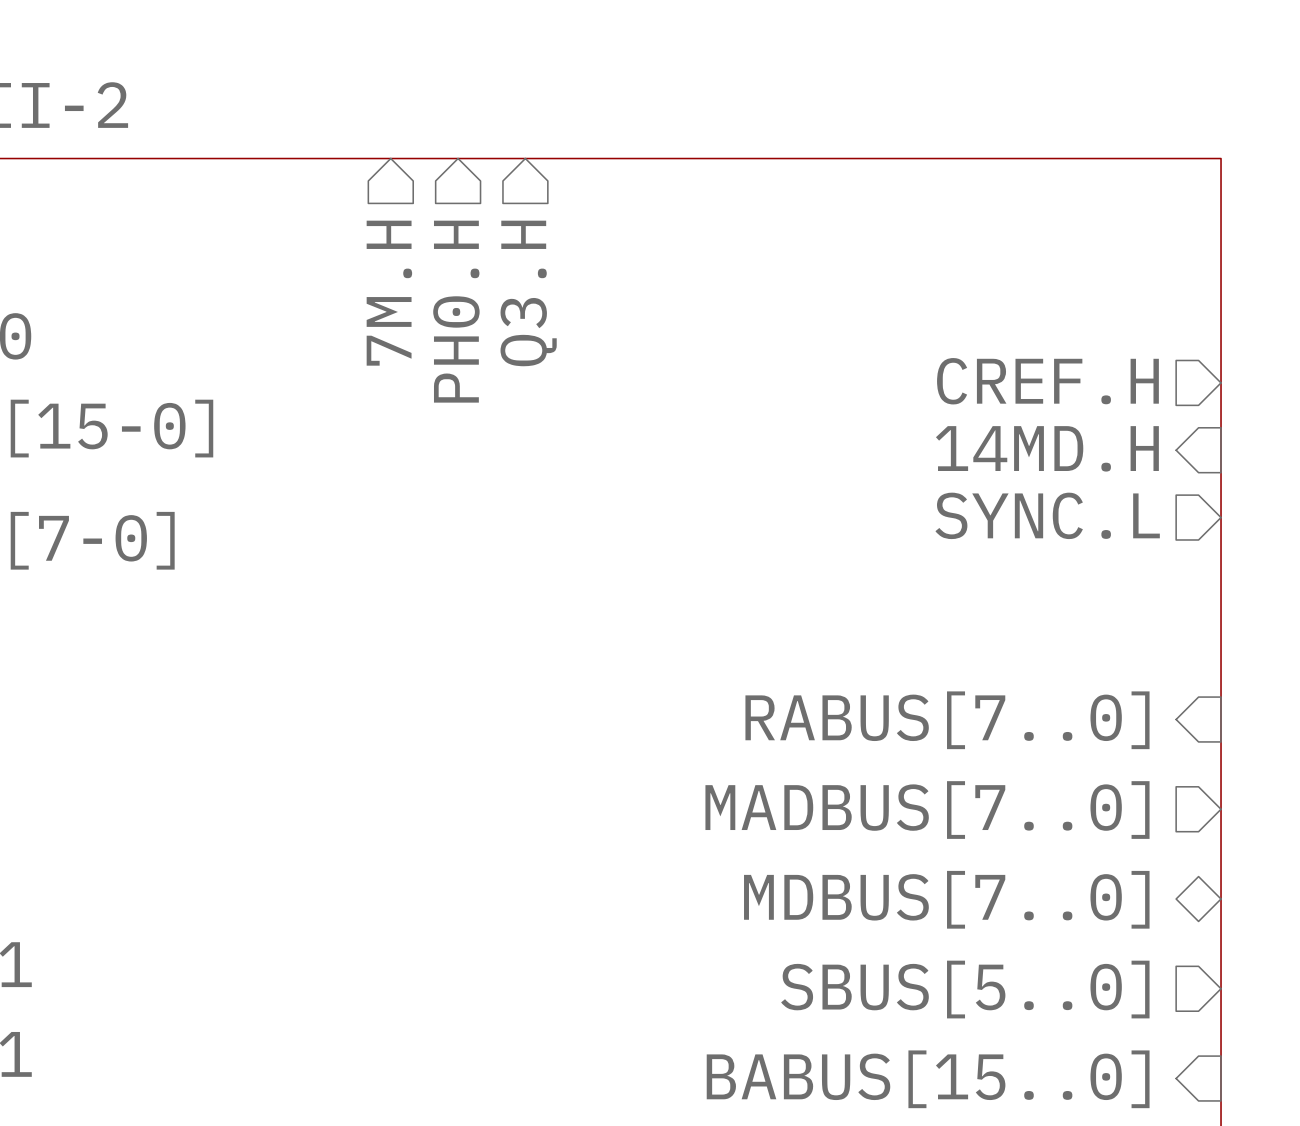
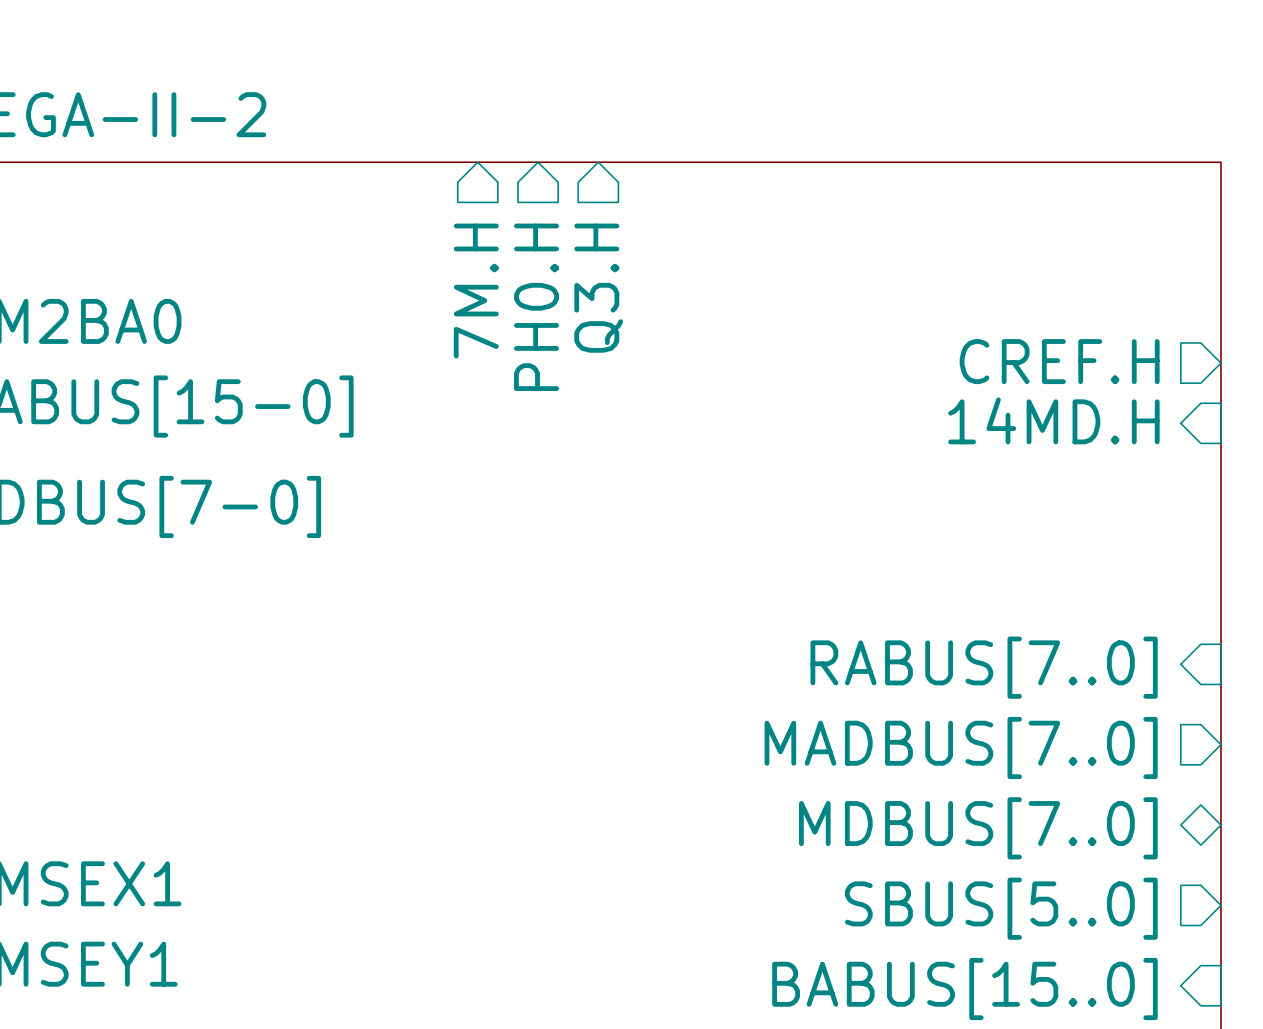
sheet pin: SYNC.L (1047, 515) -> none

